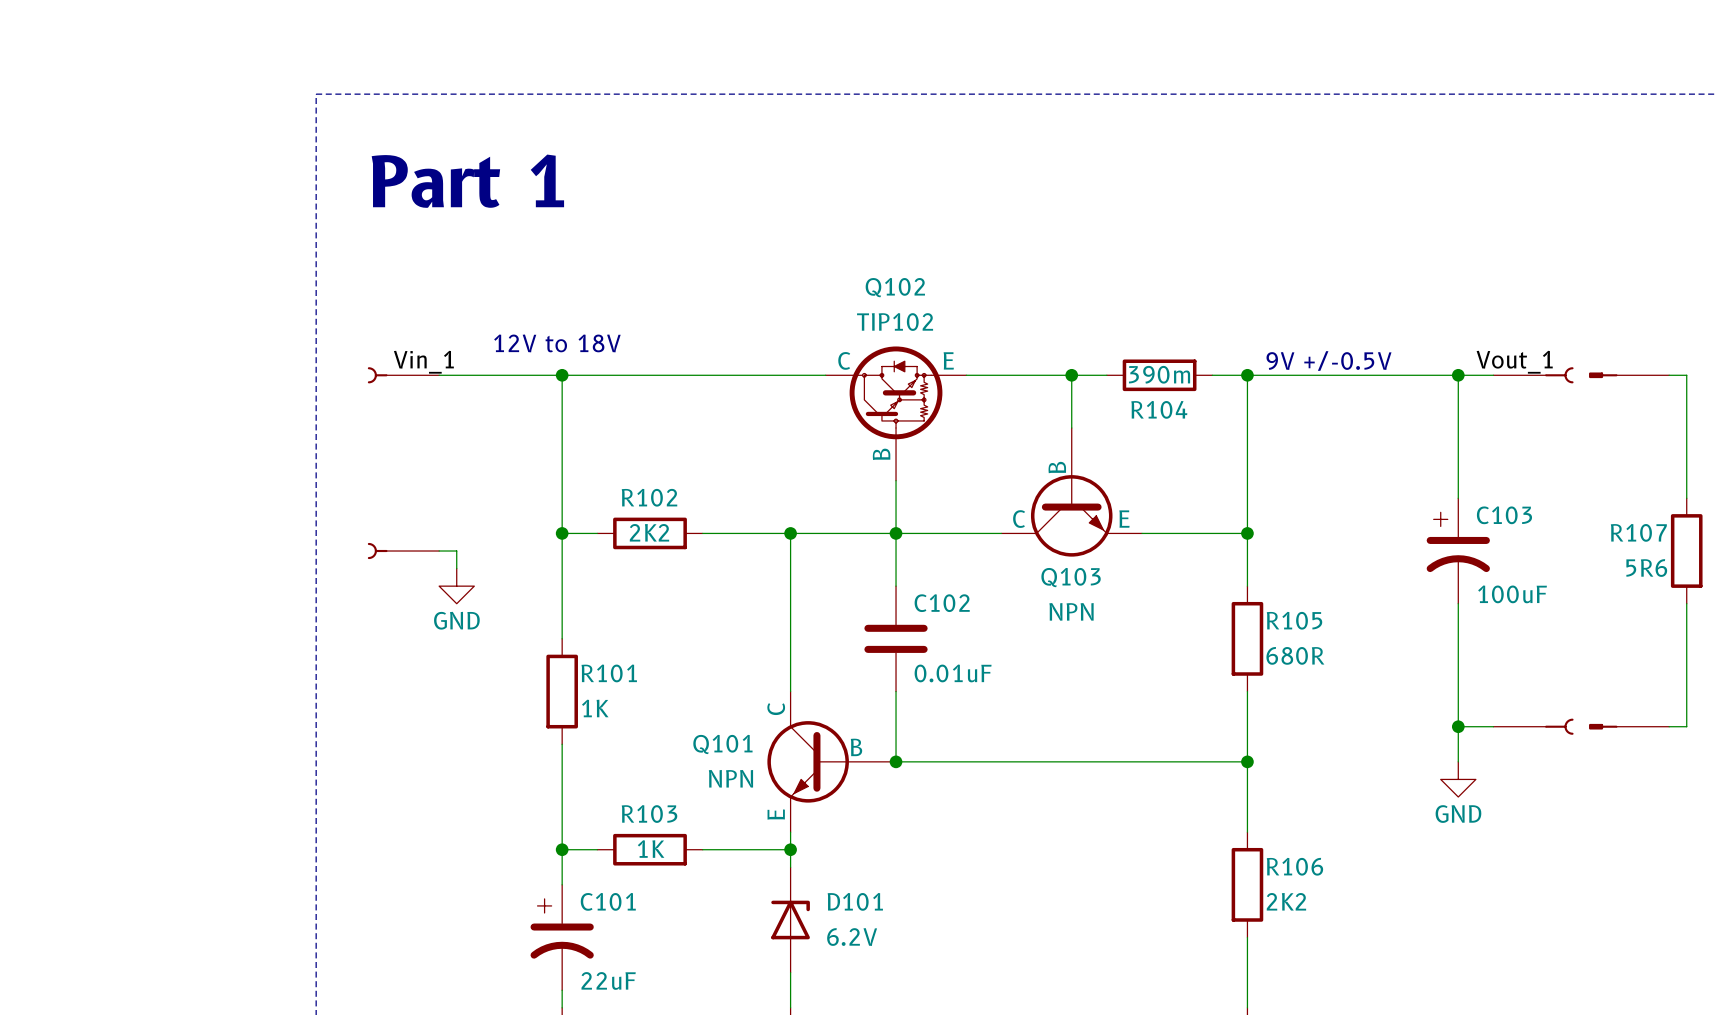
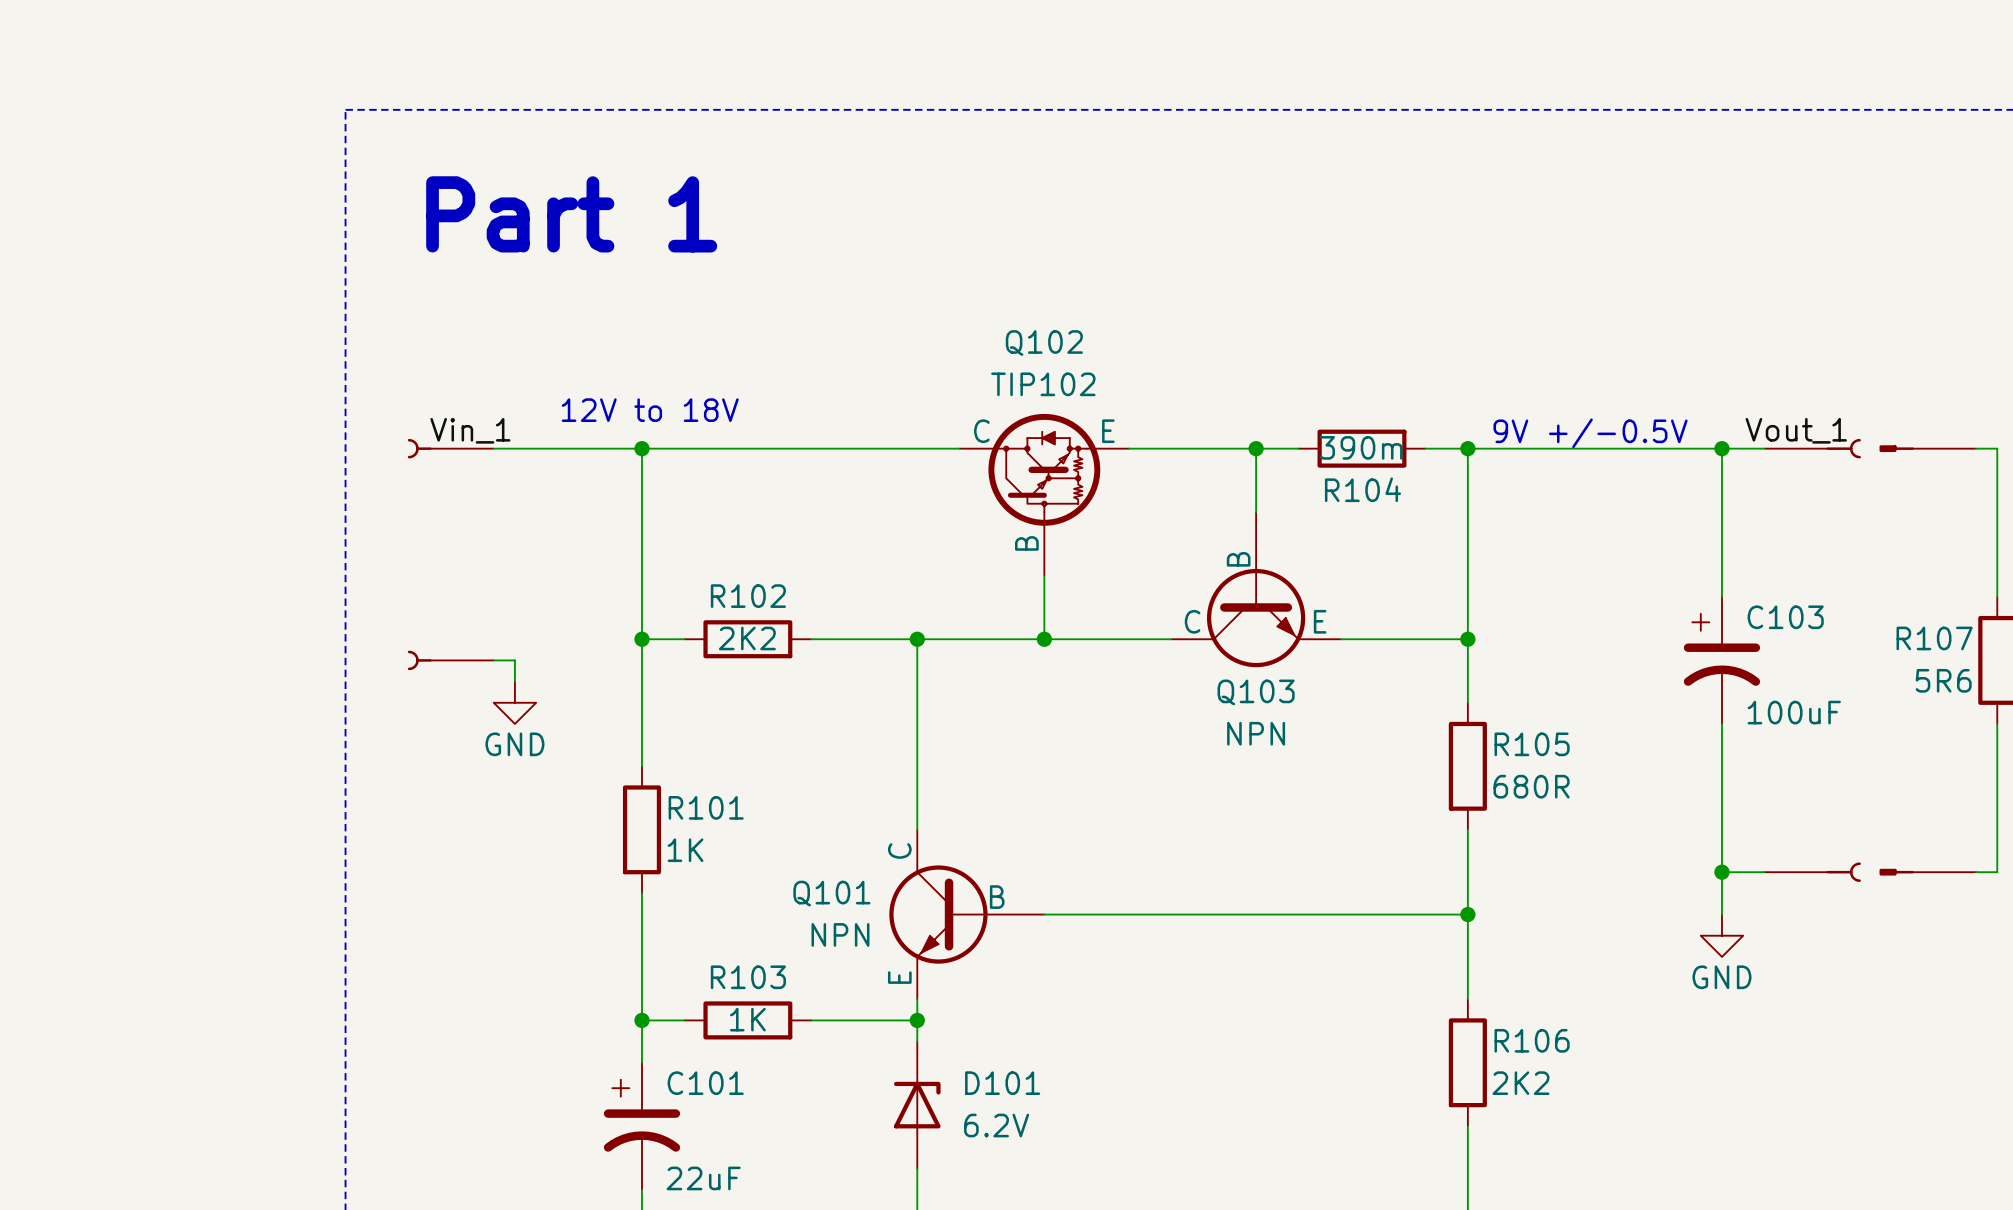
wire: (896, 533) (896, 586) -> none
C102: 0.01uF (896, 638) -> none
wire: (896, 691) (896, 761) -> none
junction: (896, 761) -> none

